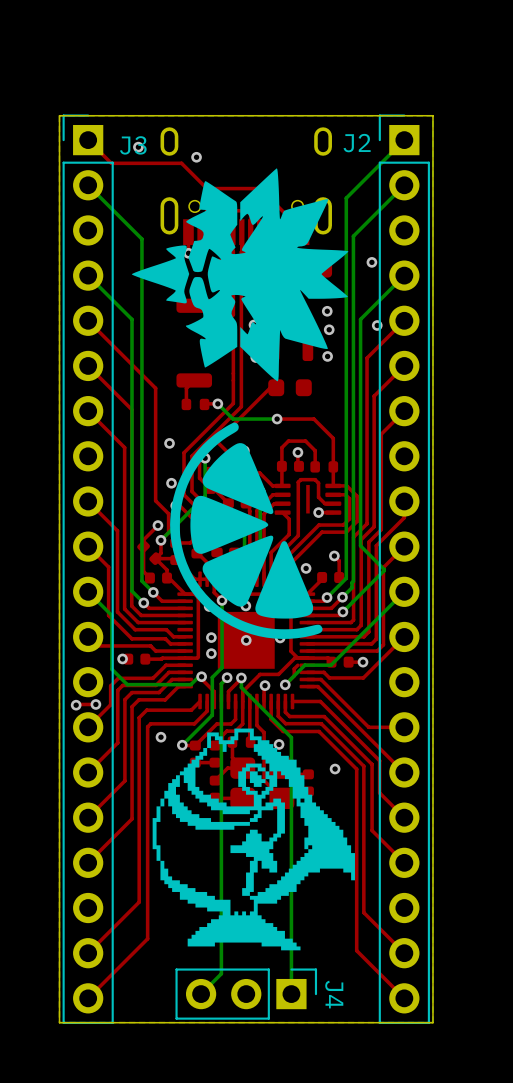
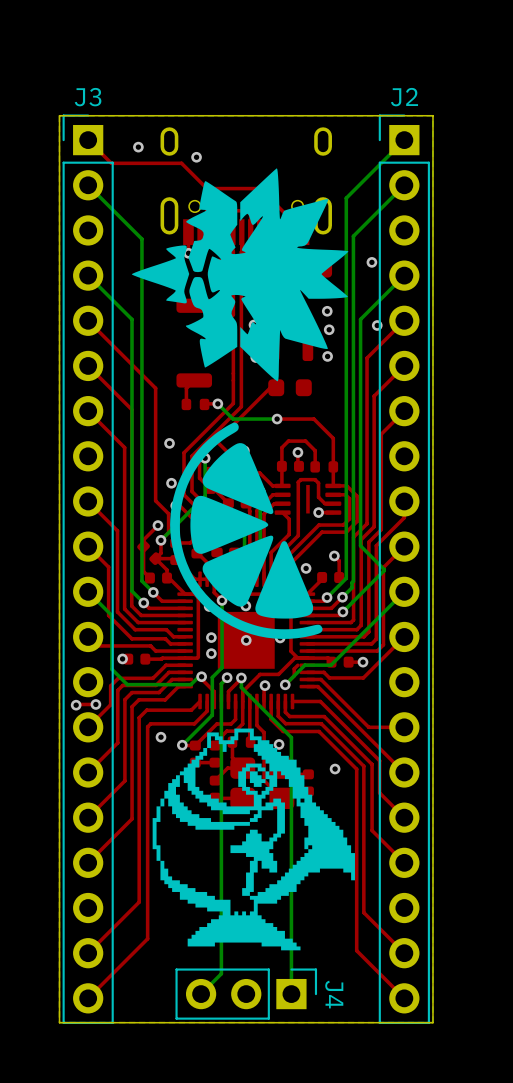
J2 name position: J2 (357, 143) -> J2 (404, 97)
J3 name position: J3 (133, 145) -> J3 (88, 97)

